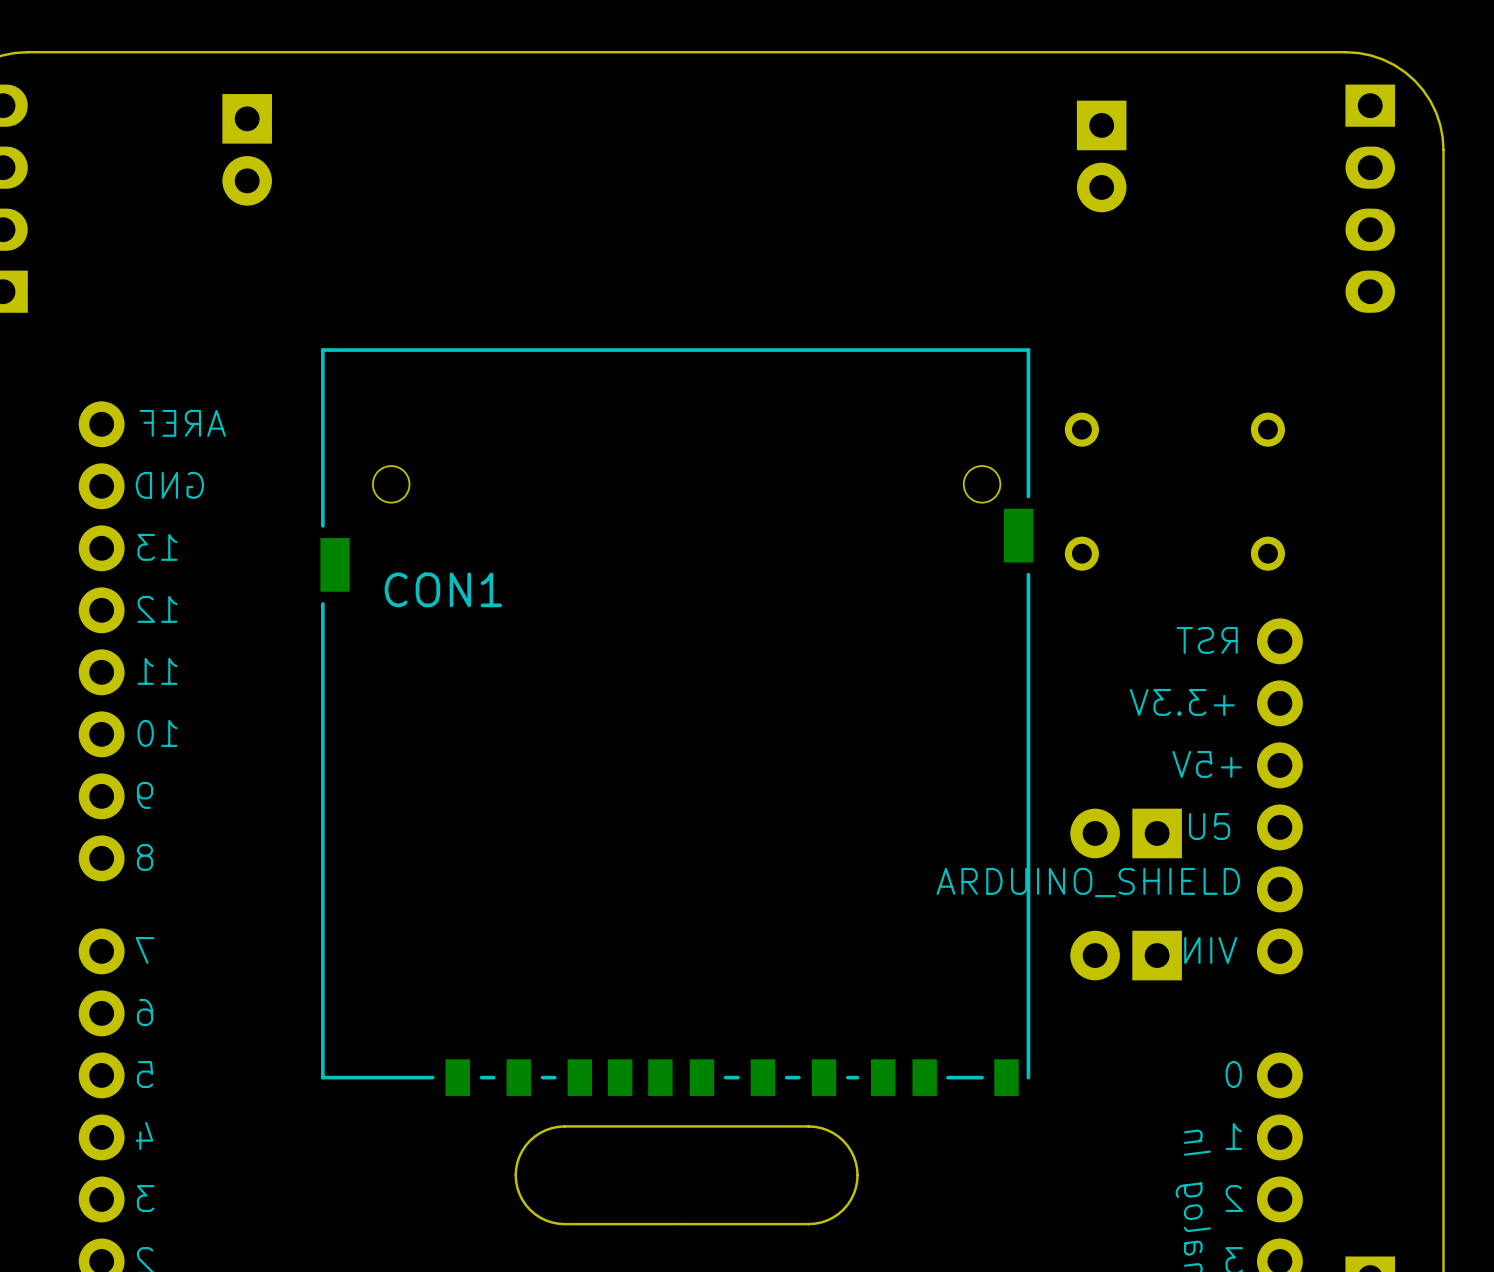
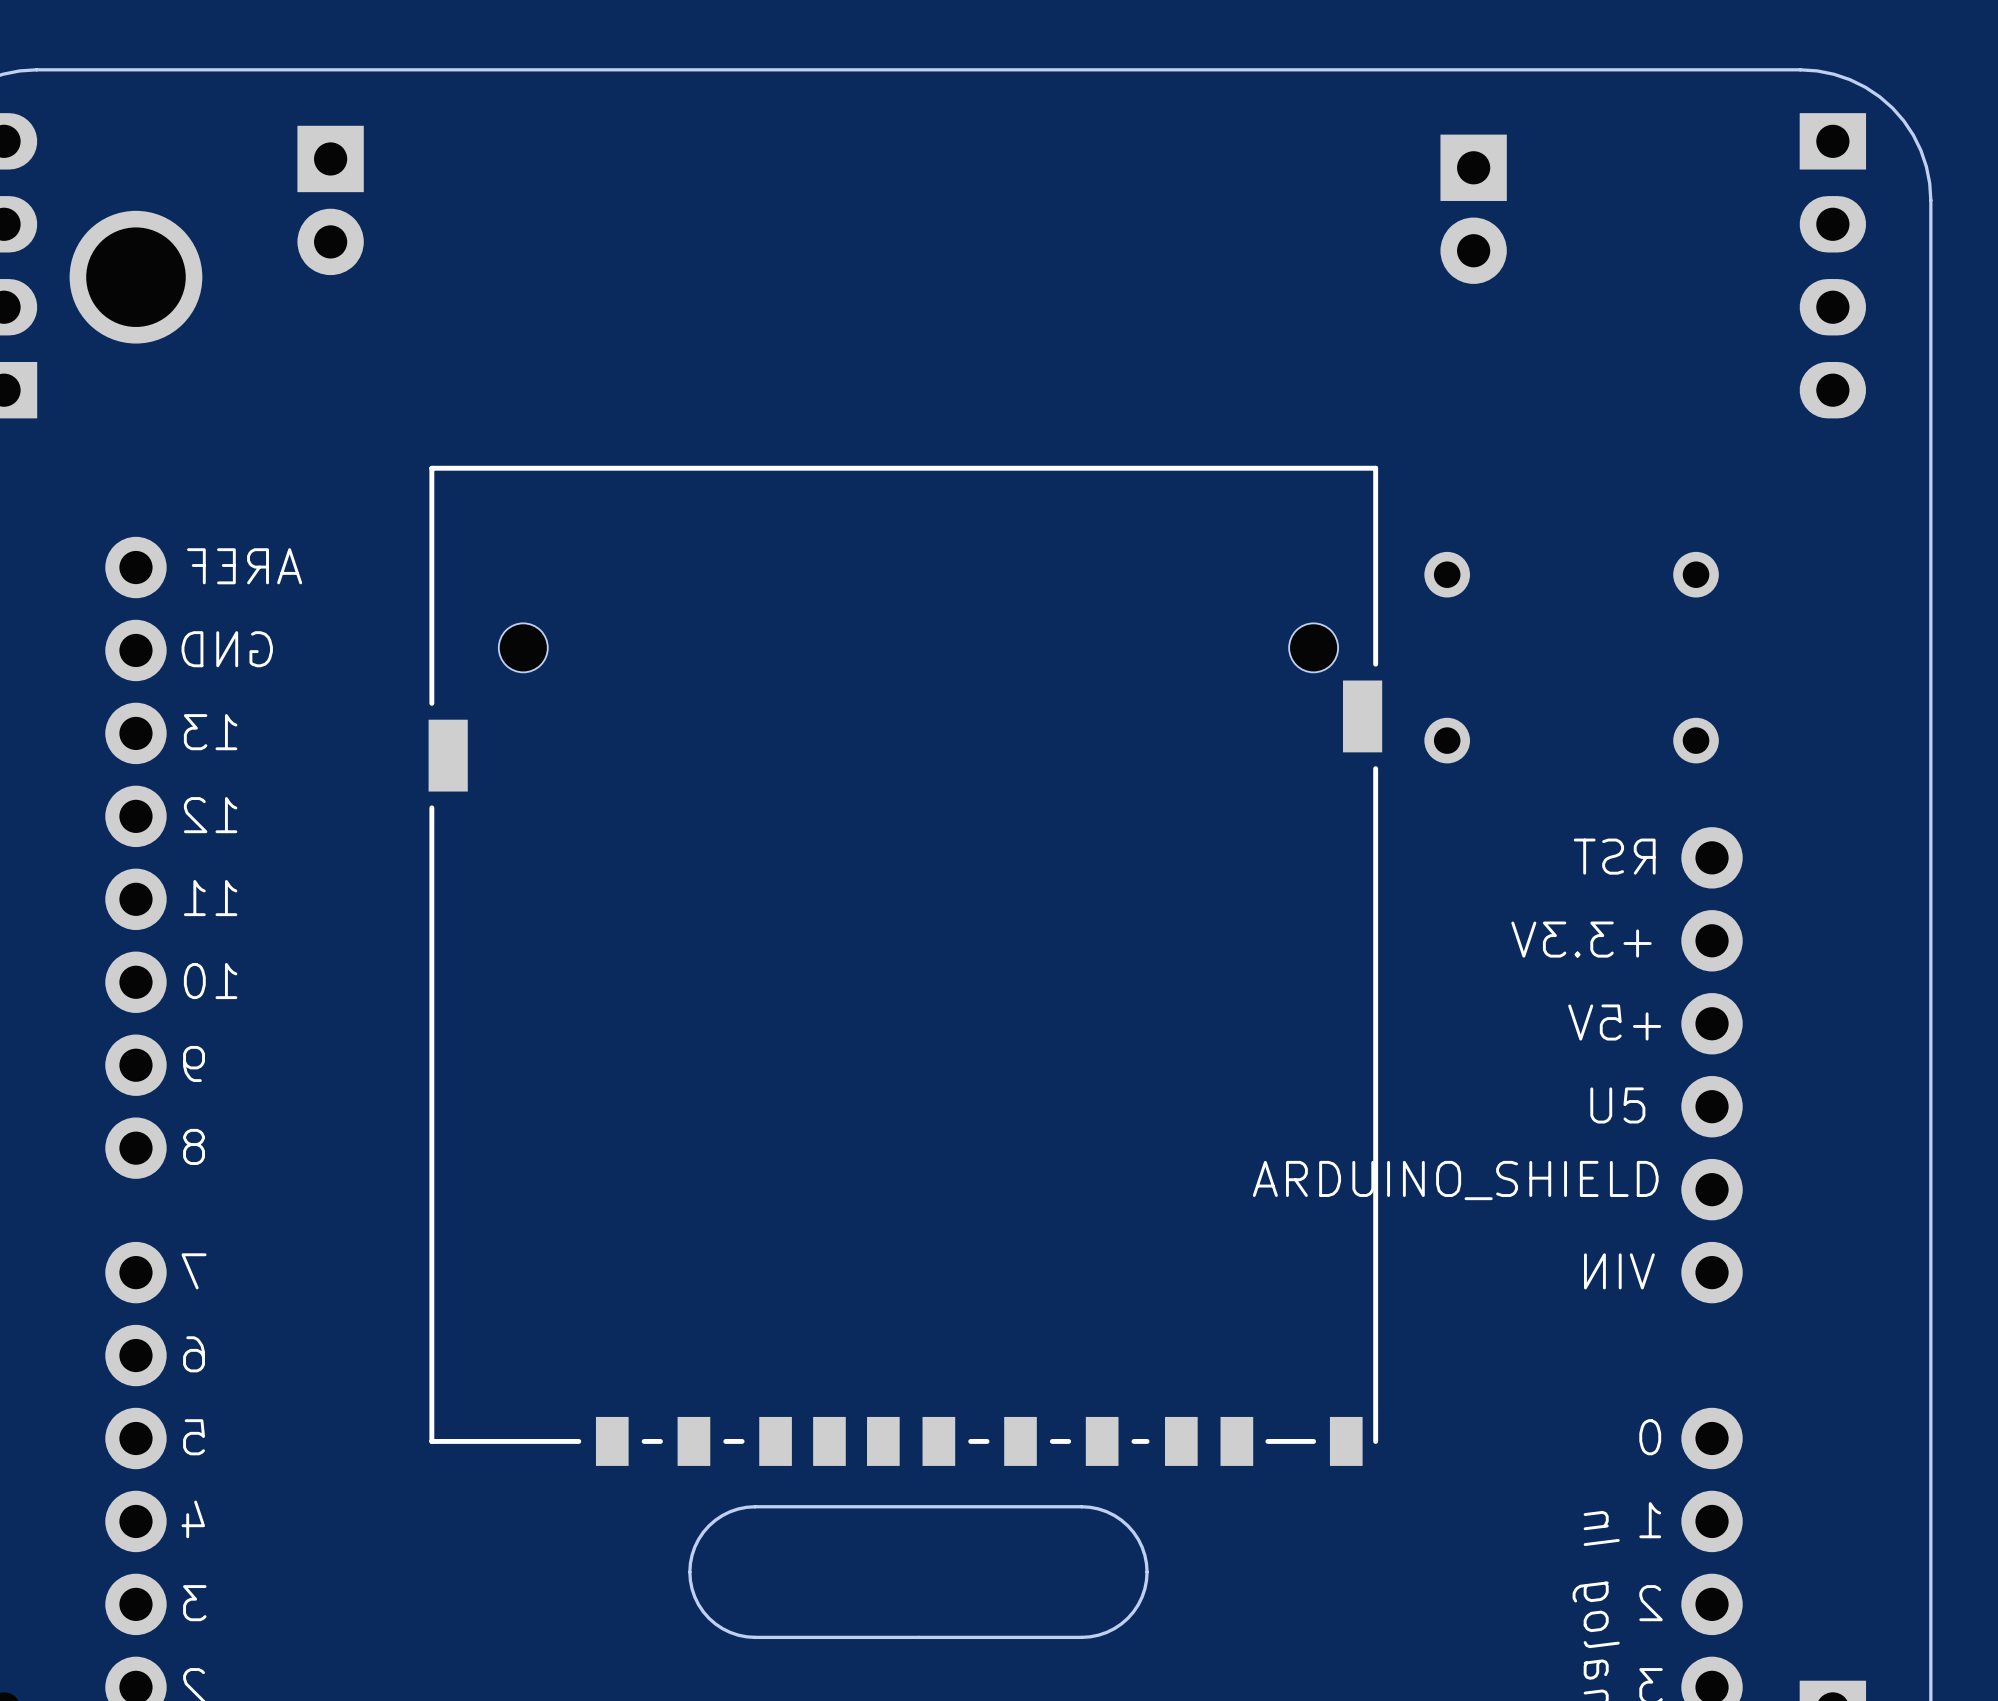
part: none -> (135, 277)
CON1 name: CON1 (443, 589) -> none
part: (1126, 833) -> none
part: (1126, 955) -> none

